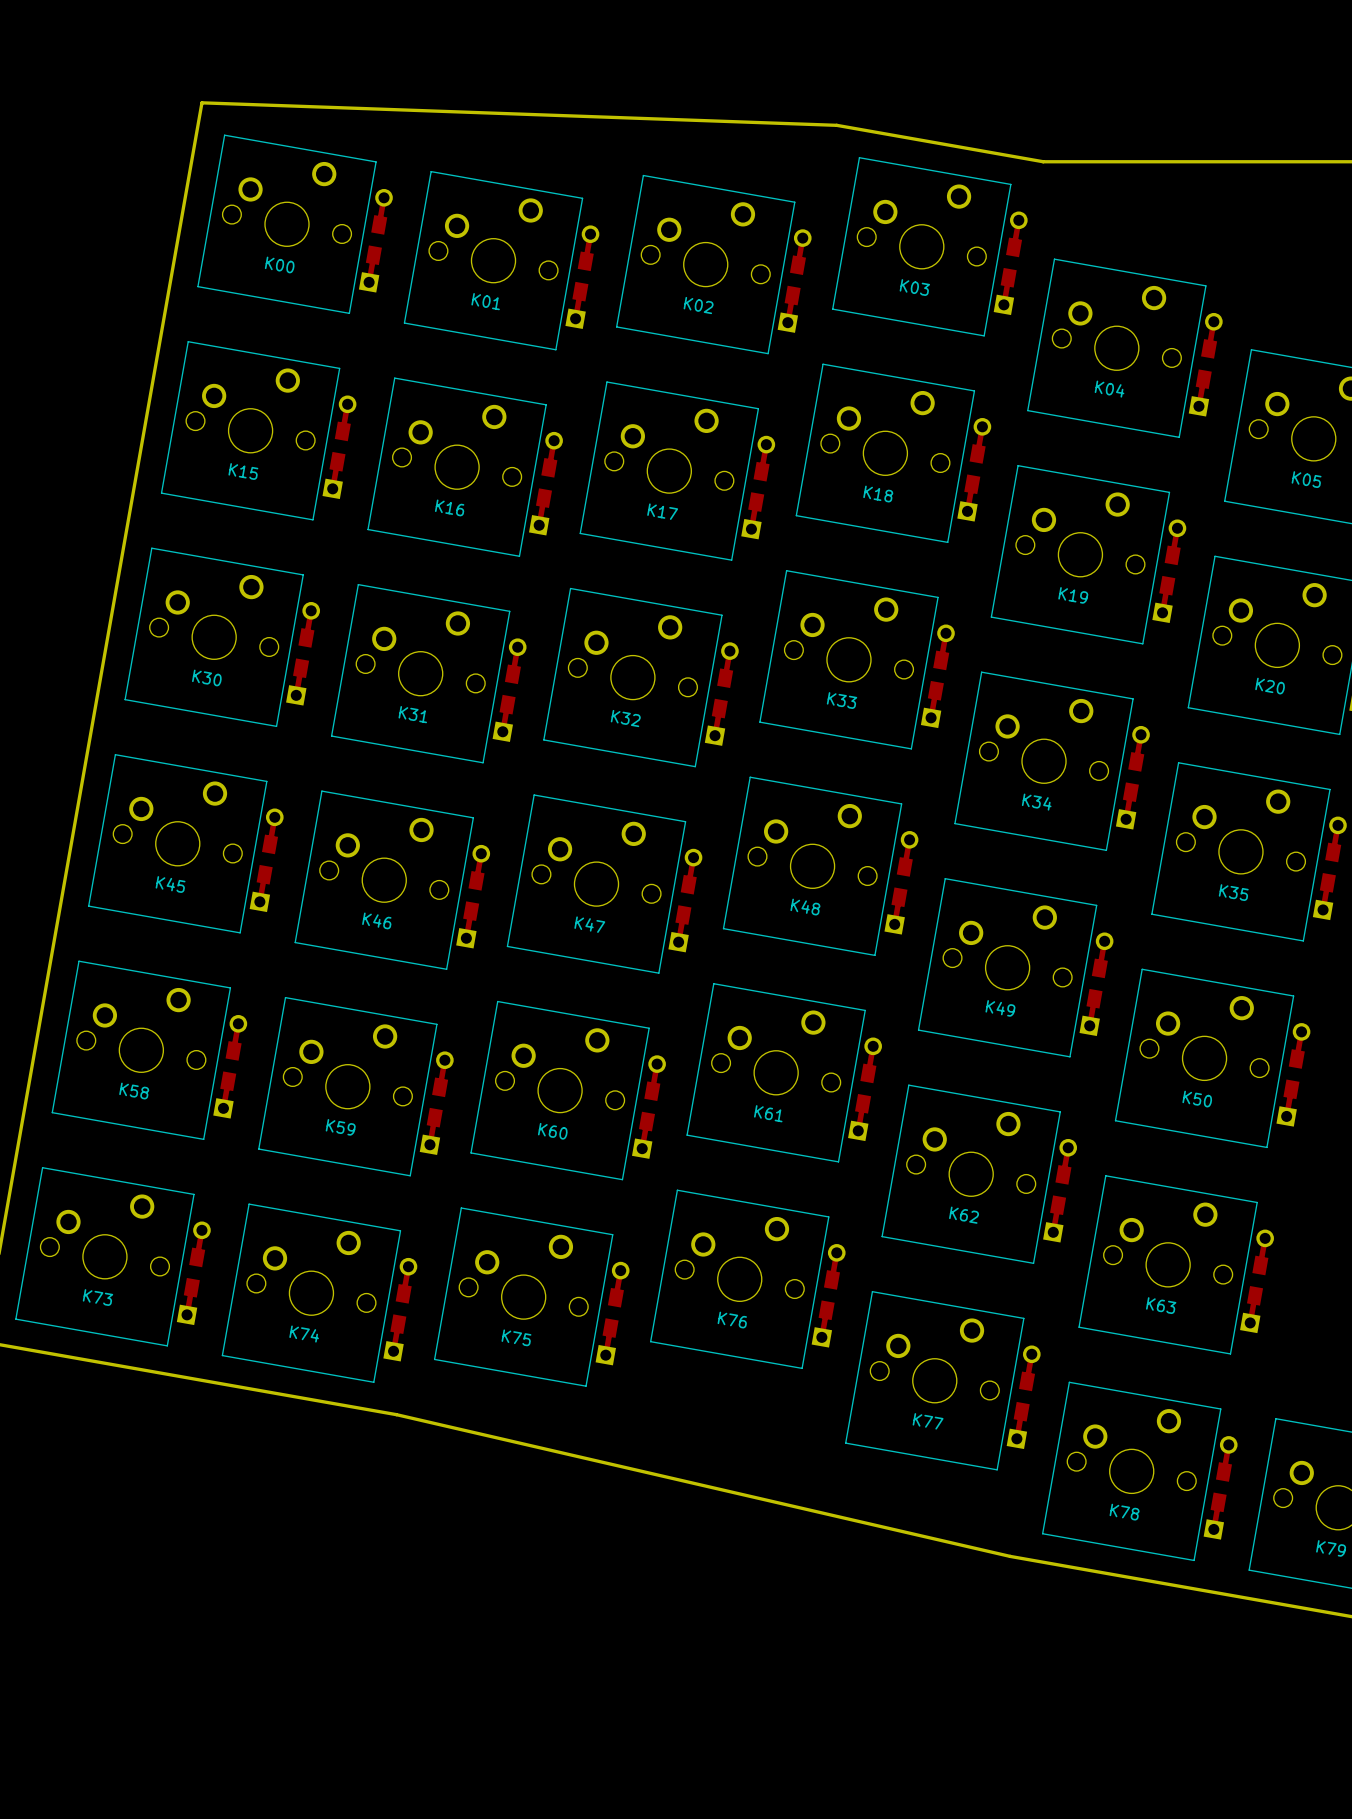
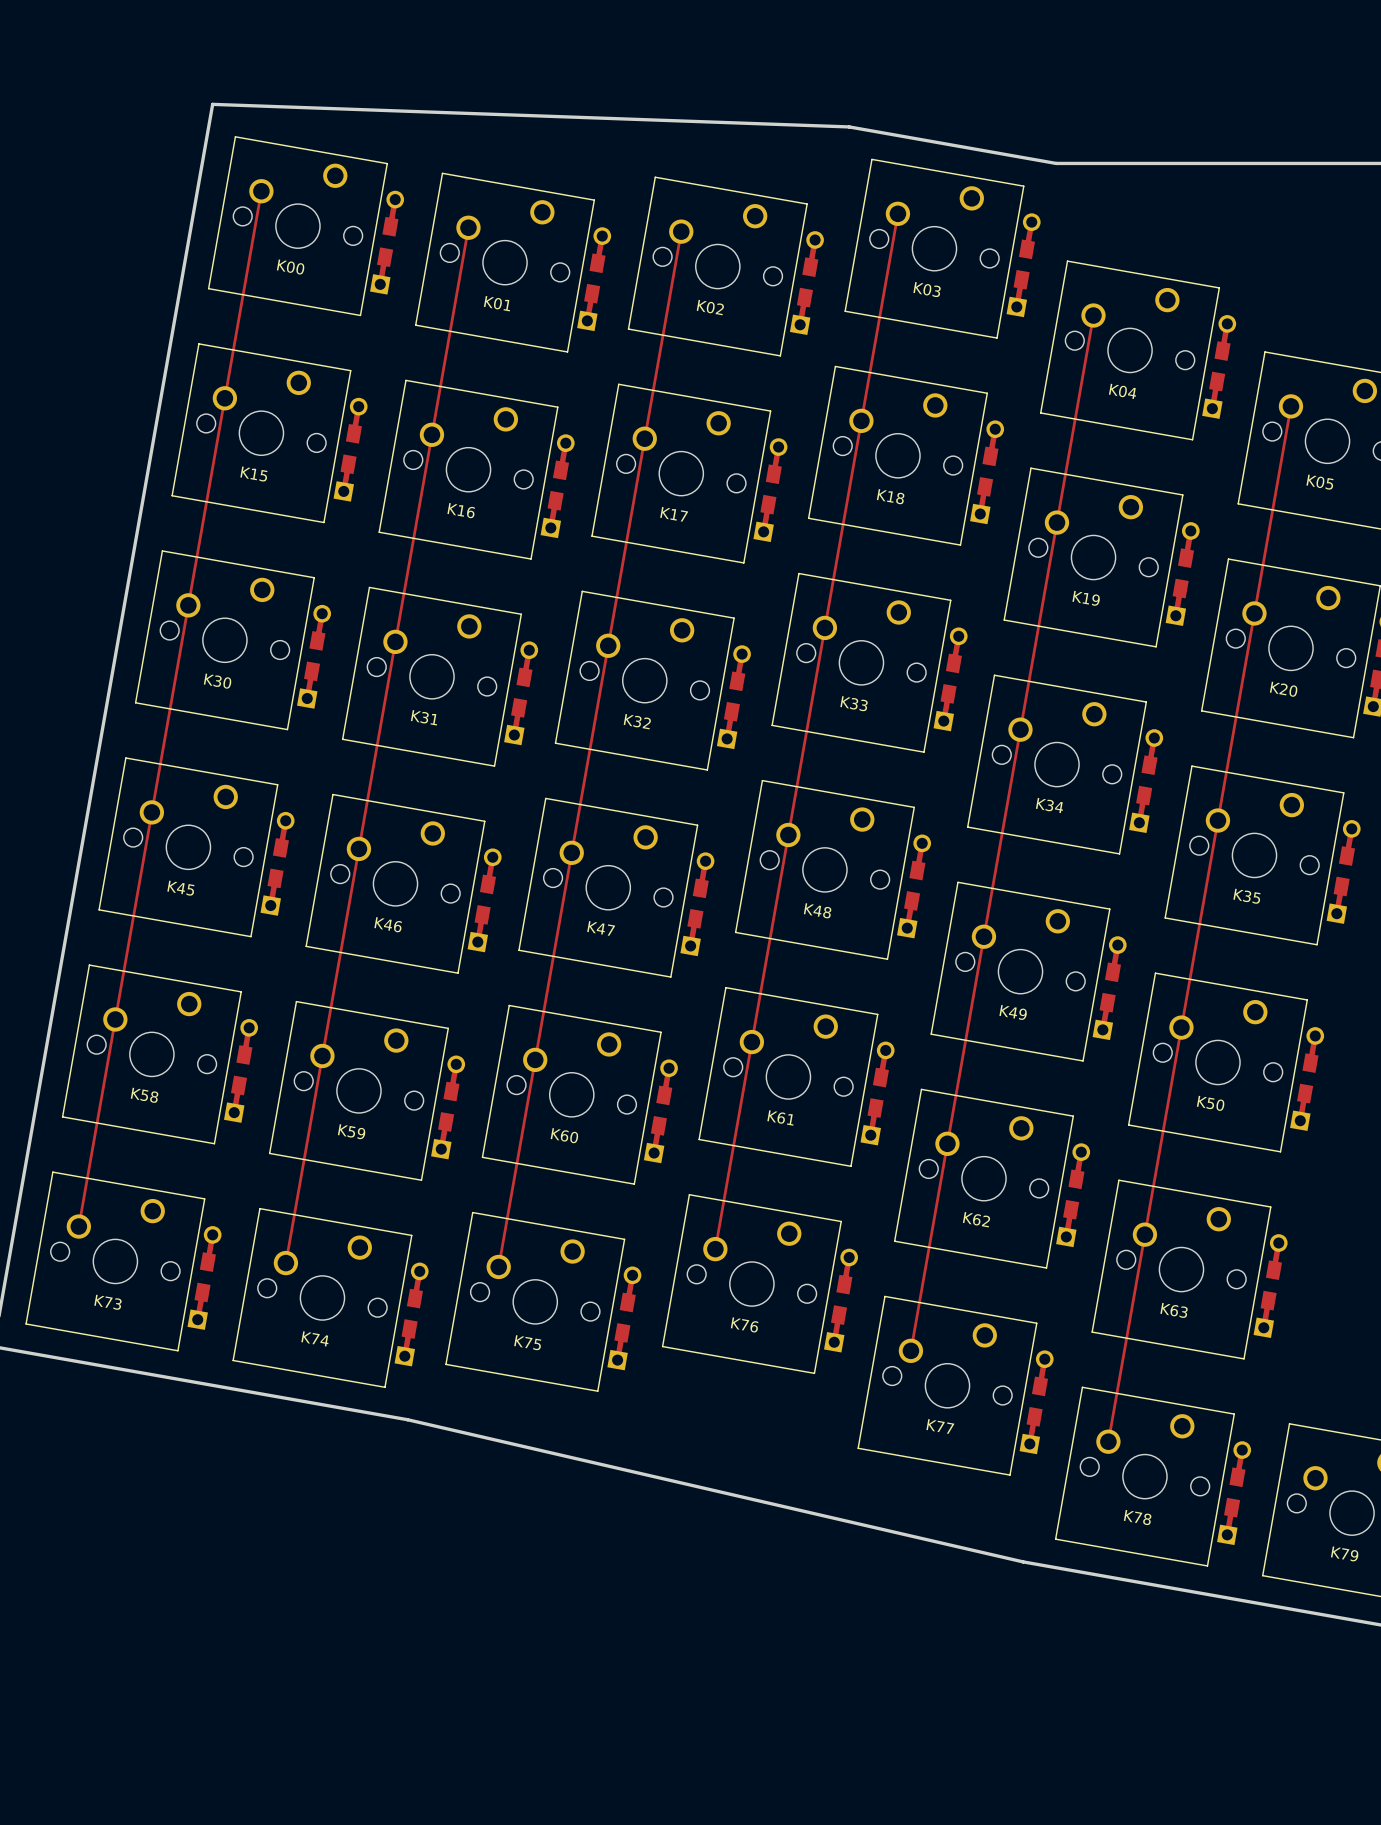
track: none -> (261, 191) (78, 1226)
track: none -> (897, 213) (715, 1249)
track: none -> (468, 227) (285, 1263)
track: none -> (681, 231) (498, 1266)
track: none -> (1093, 315) (910, 1350)
track: none -> (1290, 406) (1108, 1441)

